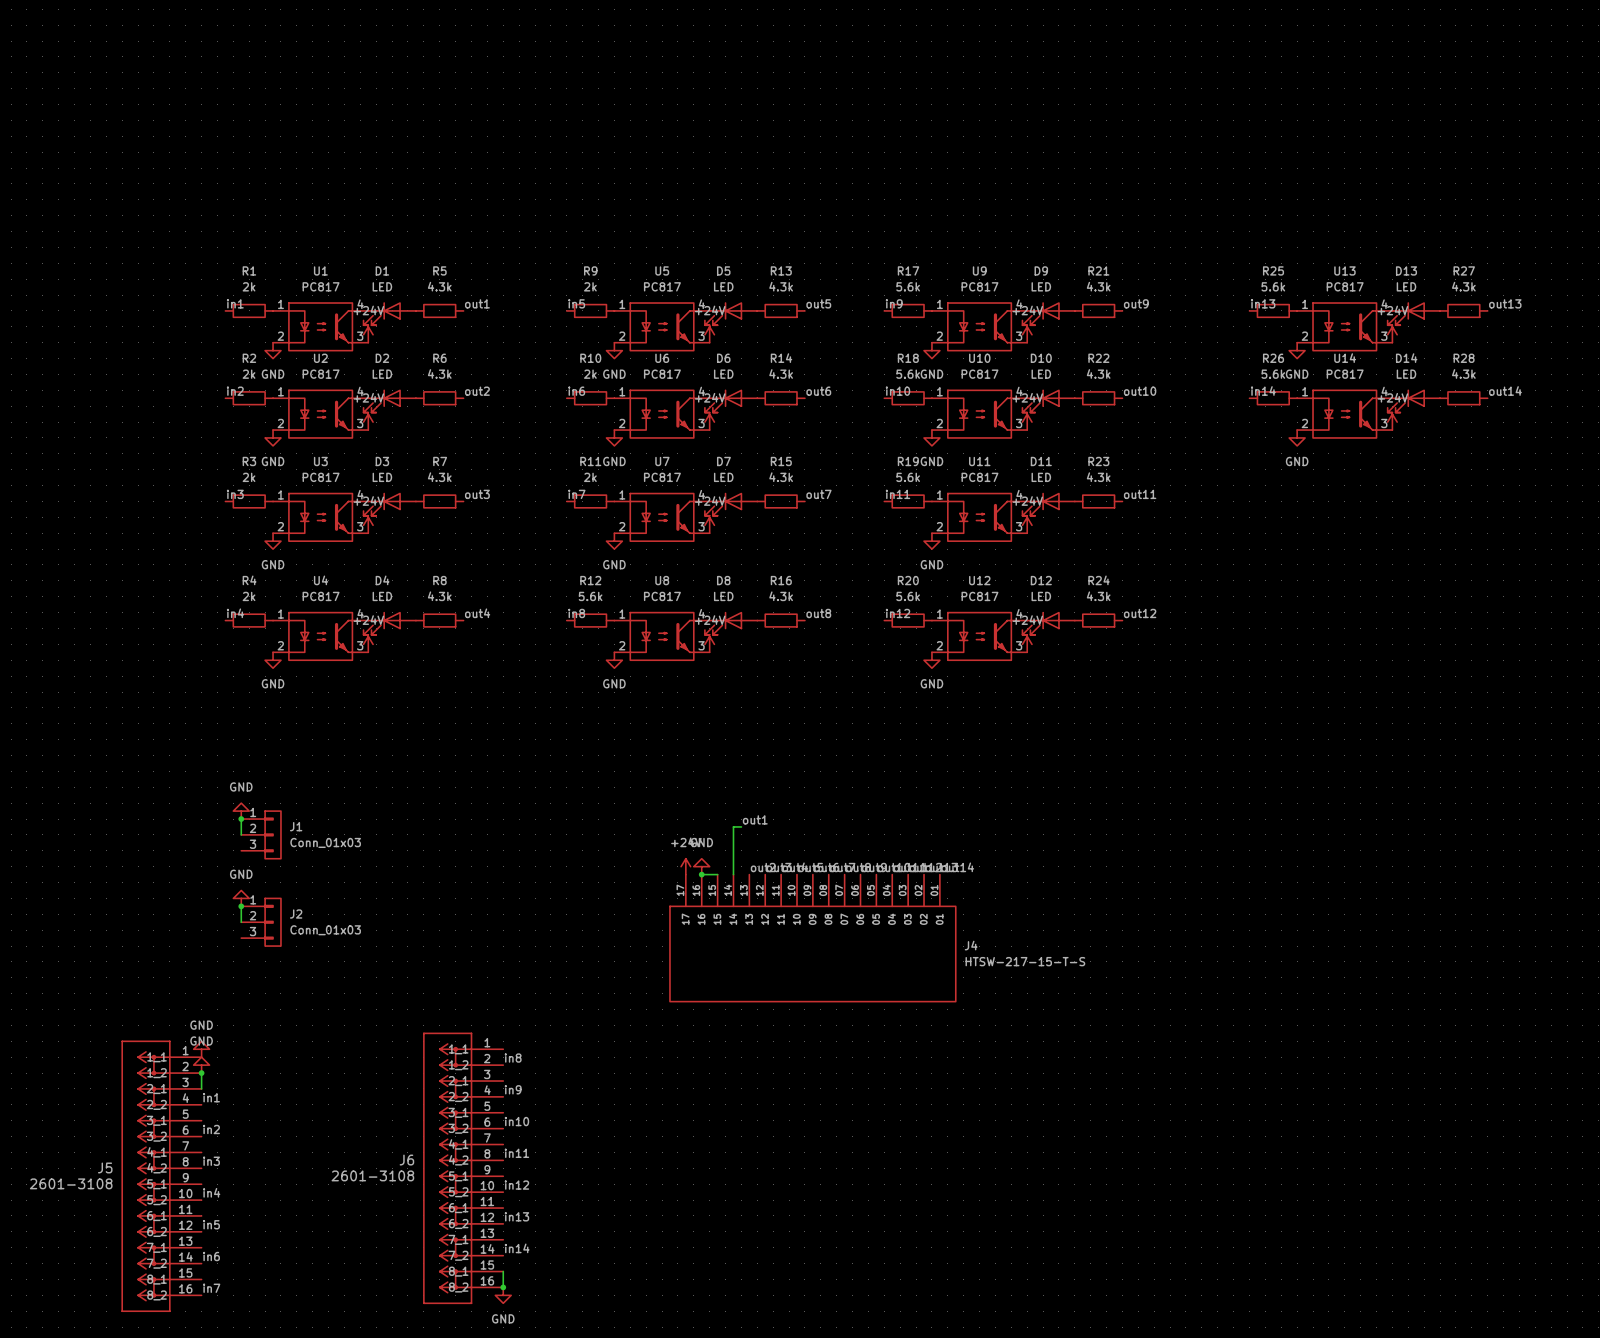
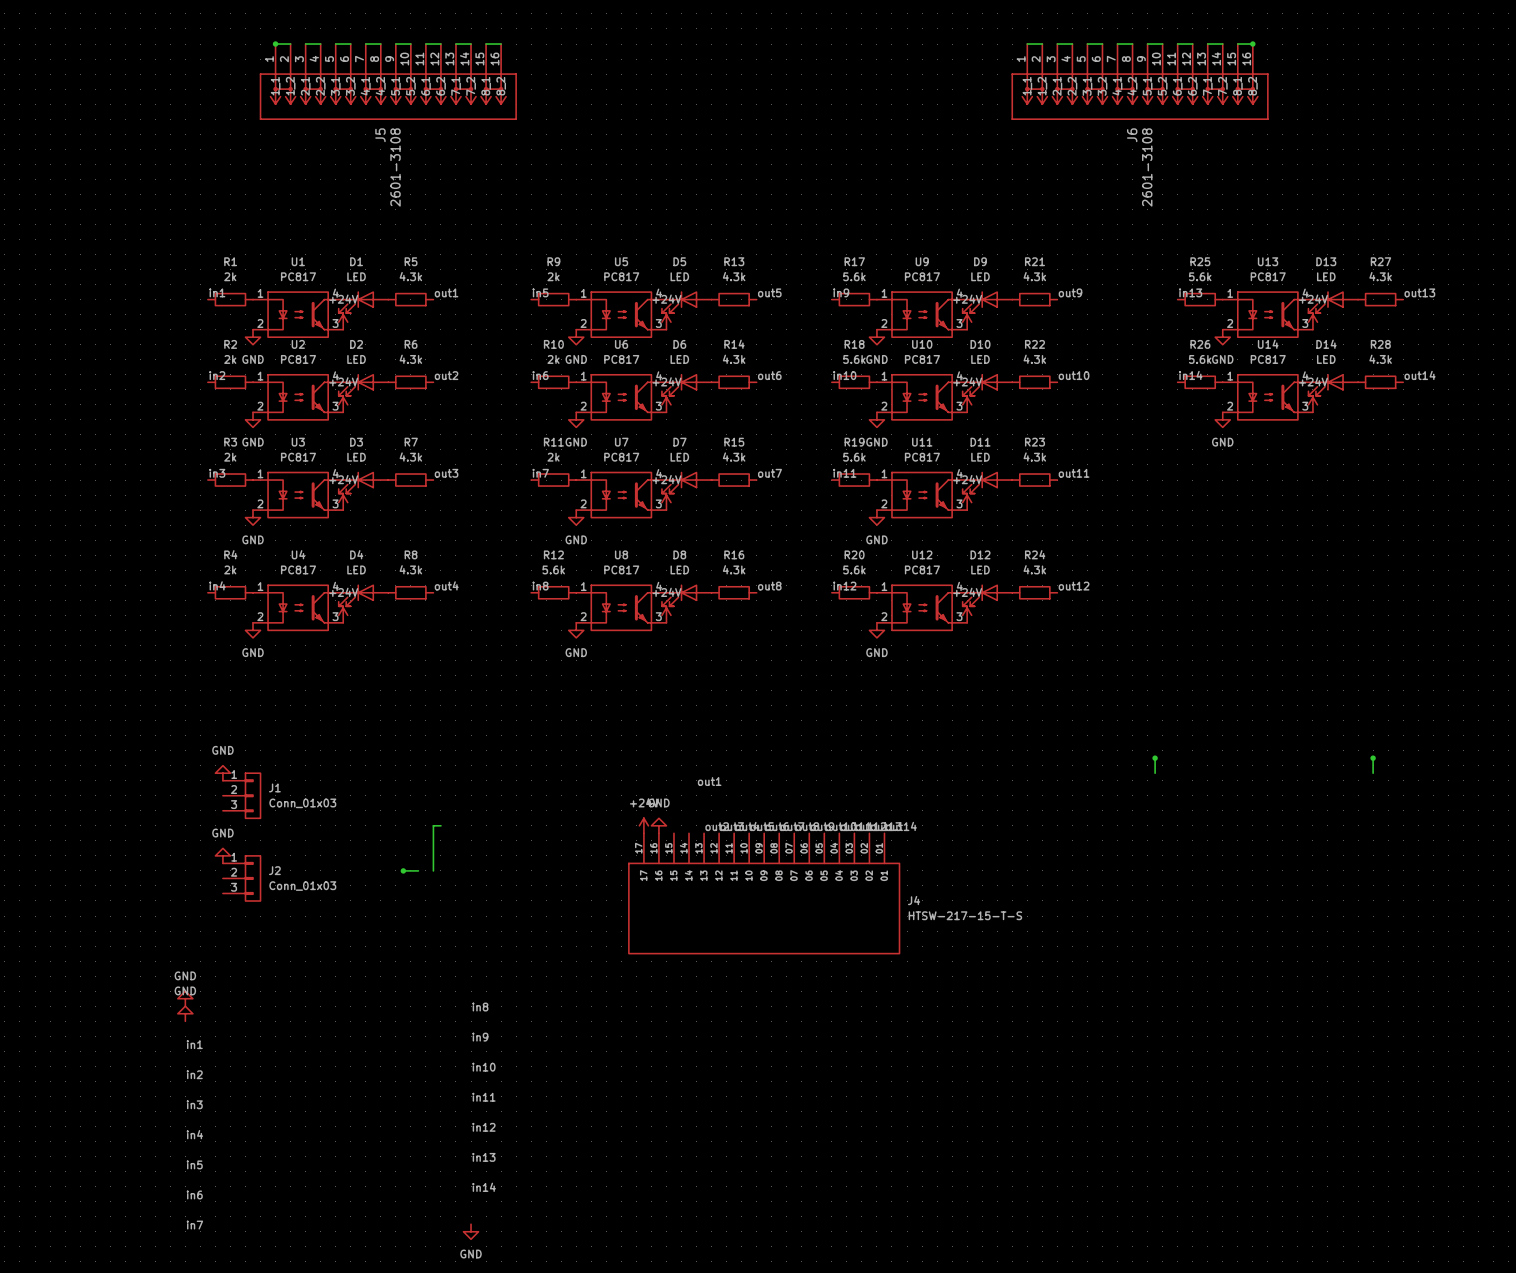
wire: none -> (275, 44) (290, 44)
junction: none -> (275, 44)
wire: none -> (305, 44) (320, 44)
wire: none -> (335, 44) (350, 44)
wire: none -> (365, 44) (380, 44)
wire: none -> (395, 44) (410, 44)
wire: none -> (425, 44) (440, 44)
wire: none -> (455, 44) (471, 44)
wire: none -> (486, 44) (501, 44)
wire: none -> (1027, 44) (1042, 44)
wire: none -> (1057, 44) (1072, 44)
wire: none -> (1087, 44) (1102, 44)
wire: none -> (1117, 44) (1132, 44)
wire: none -> (1147, 44) (1162, 44)
wire: none -> (1177, 44) (1192, 44)
wire: none -> (1207, 44) (1222, 44)
wire: none -> (1237, 44) (1252, 44)
junction: none -> (1252, 44)
wire: none -> (1155, 758) (1155, 773)
junction: none -> (1155, 758)
wire: none -> (1373, 758) (1373, 773)
junction: none -> (1373, 758)
wire: (241, 819) (241, 834) -> none
junction: (241, 819) -> none
wire: (741, 826) (733, 826) (733, 874) -> none
wire: none -> (440, 825) (433, 825) (433, 870)
wire: (701, 874) (717, 874) -> none
junction: (701, 874) -> none
wire: (241, 906) (241, 922) -> none
junction: (241, 906) -> none
wire: none -> (403, 870) (418, 870)
junction: none -> (403, 870)
wire: (201, 1073) (201, 1088) -> none
junction: (201, 1073) -> none
J6 rotation: 0° (447, 1168) -> 90° counterclockwise (1140, 96)
J6 position: (463, 1168) -> (1140, 81)
J5 rotation: 0° (146, 1176) -> 90° counterclockwise (388, 96)
J5 position: (161, 1176) -> (388, 81)
wire: (503, 1271) (503, 1287) -> none
junction: (503, 1287) -> none

